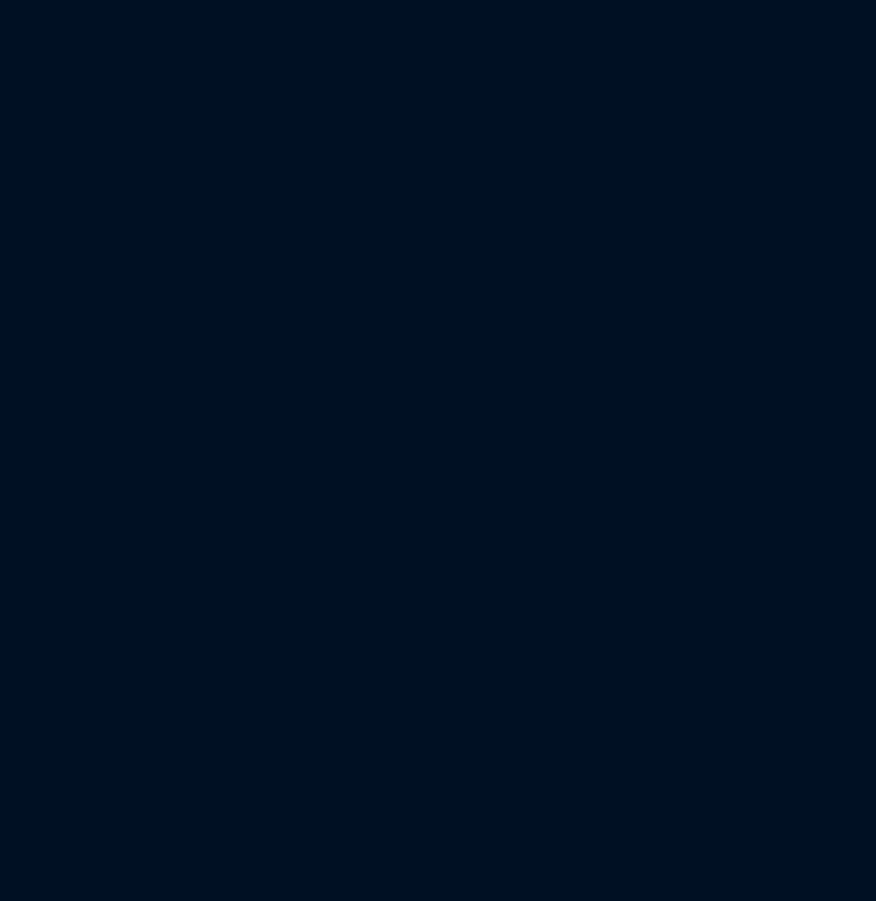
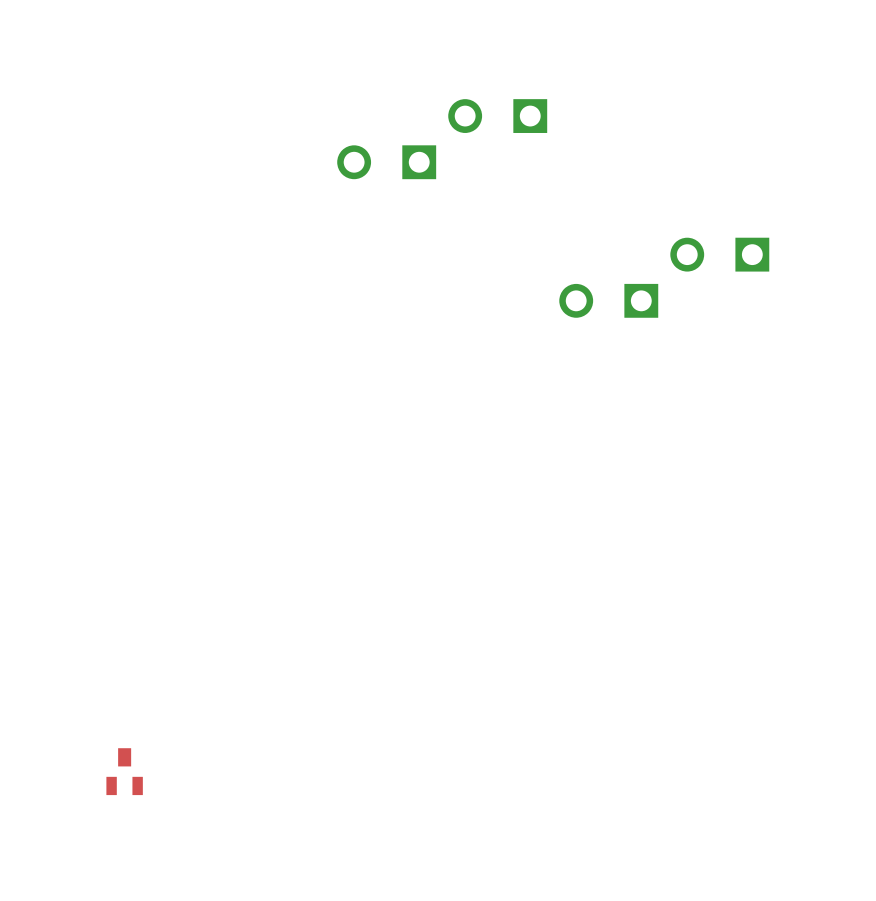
part: none -> (497, 116)
part: none -> (386, 162)
part: none -> (719, 254)
part: none -> (608, 300)
part: none -> (124, 771)

